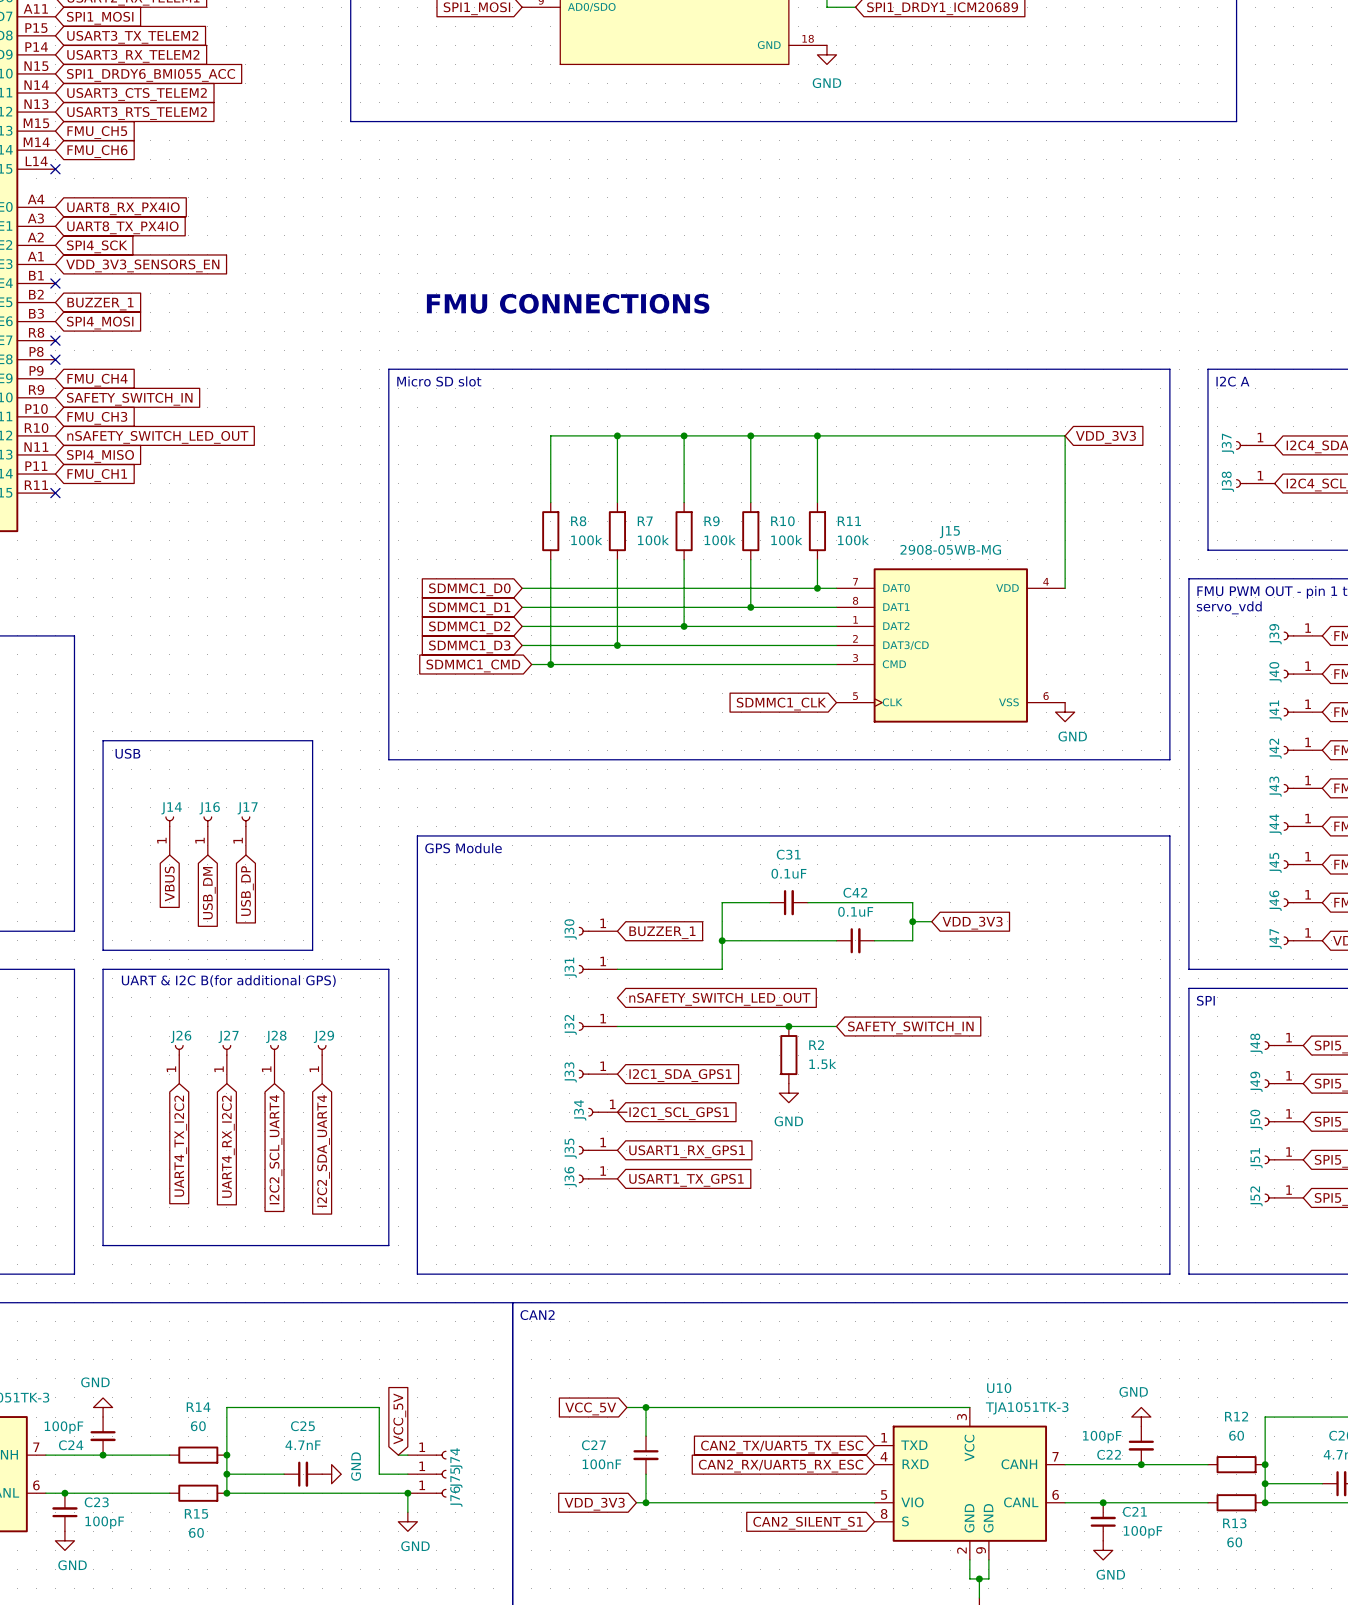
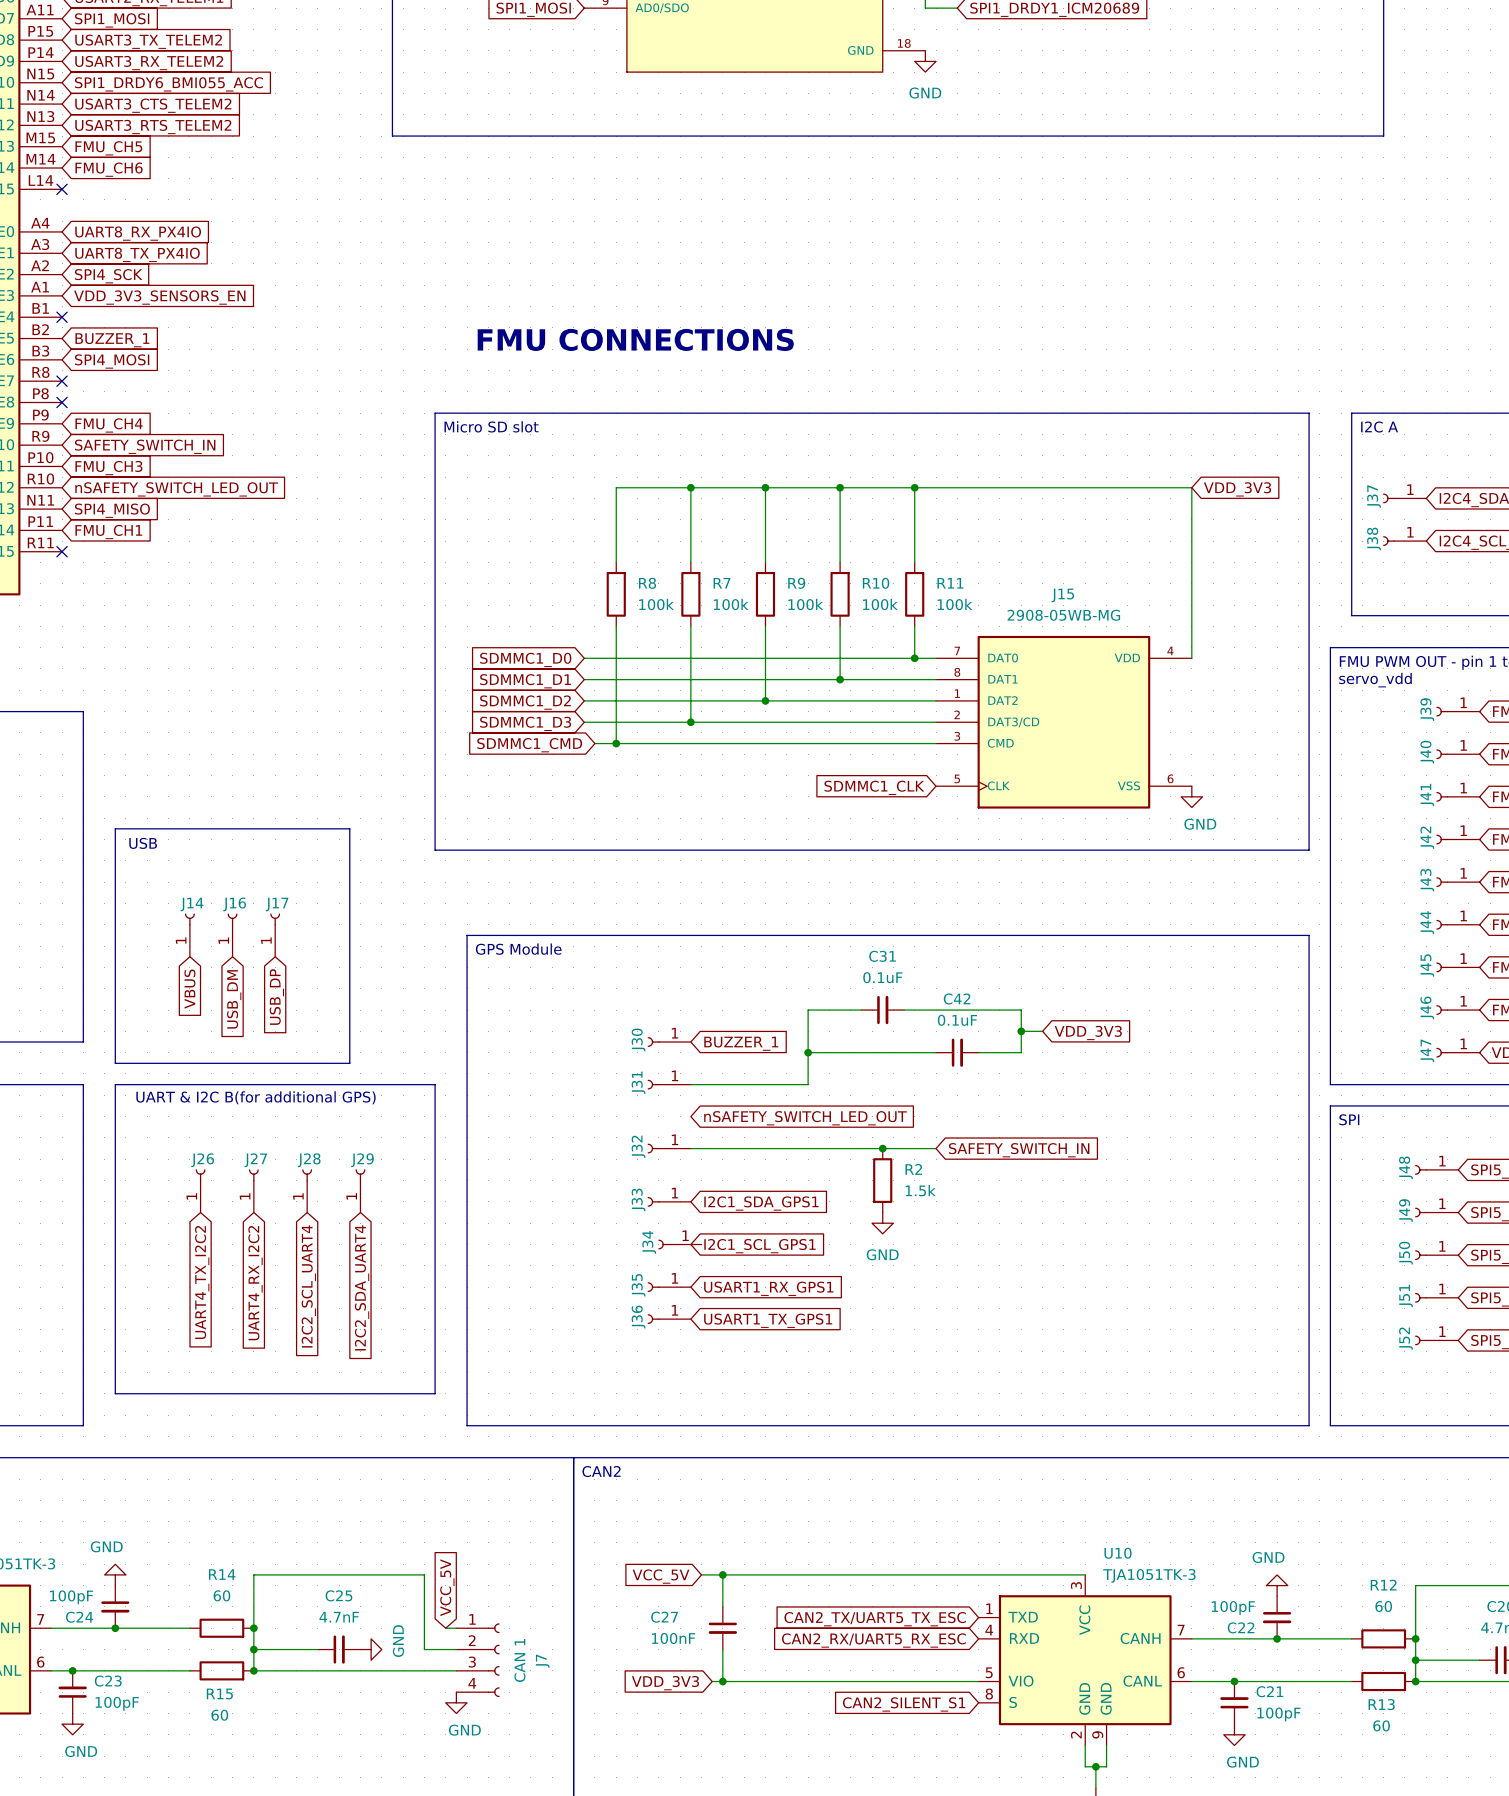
J74: (427, 1455) -> none
J75: (427, 1474) -> none
J7: none -> CAN 1 (478, 1660)
wire: (407, 1493) (407, 1512) -> none
junction: (407, 1493) -> none
J76: (427, 1493) -> none

